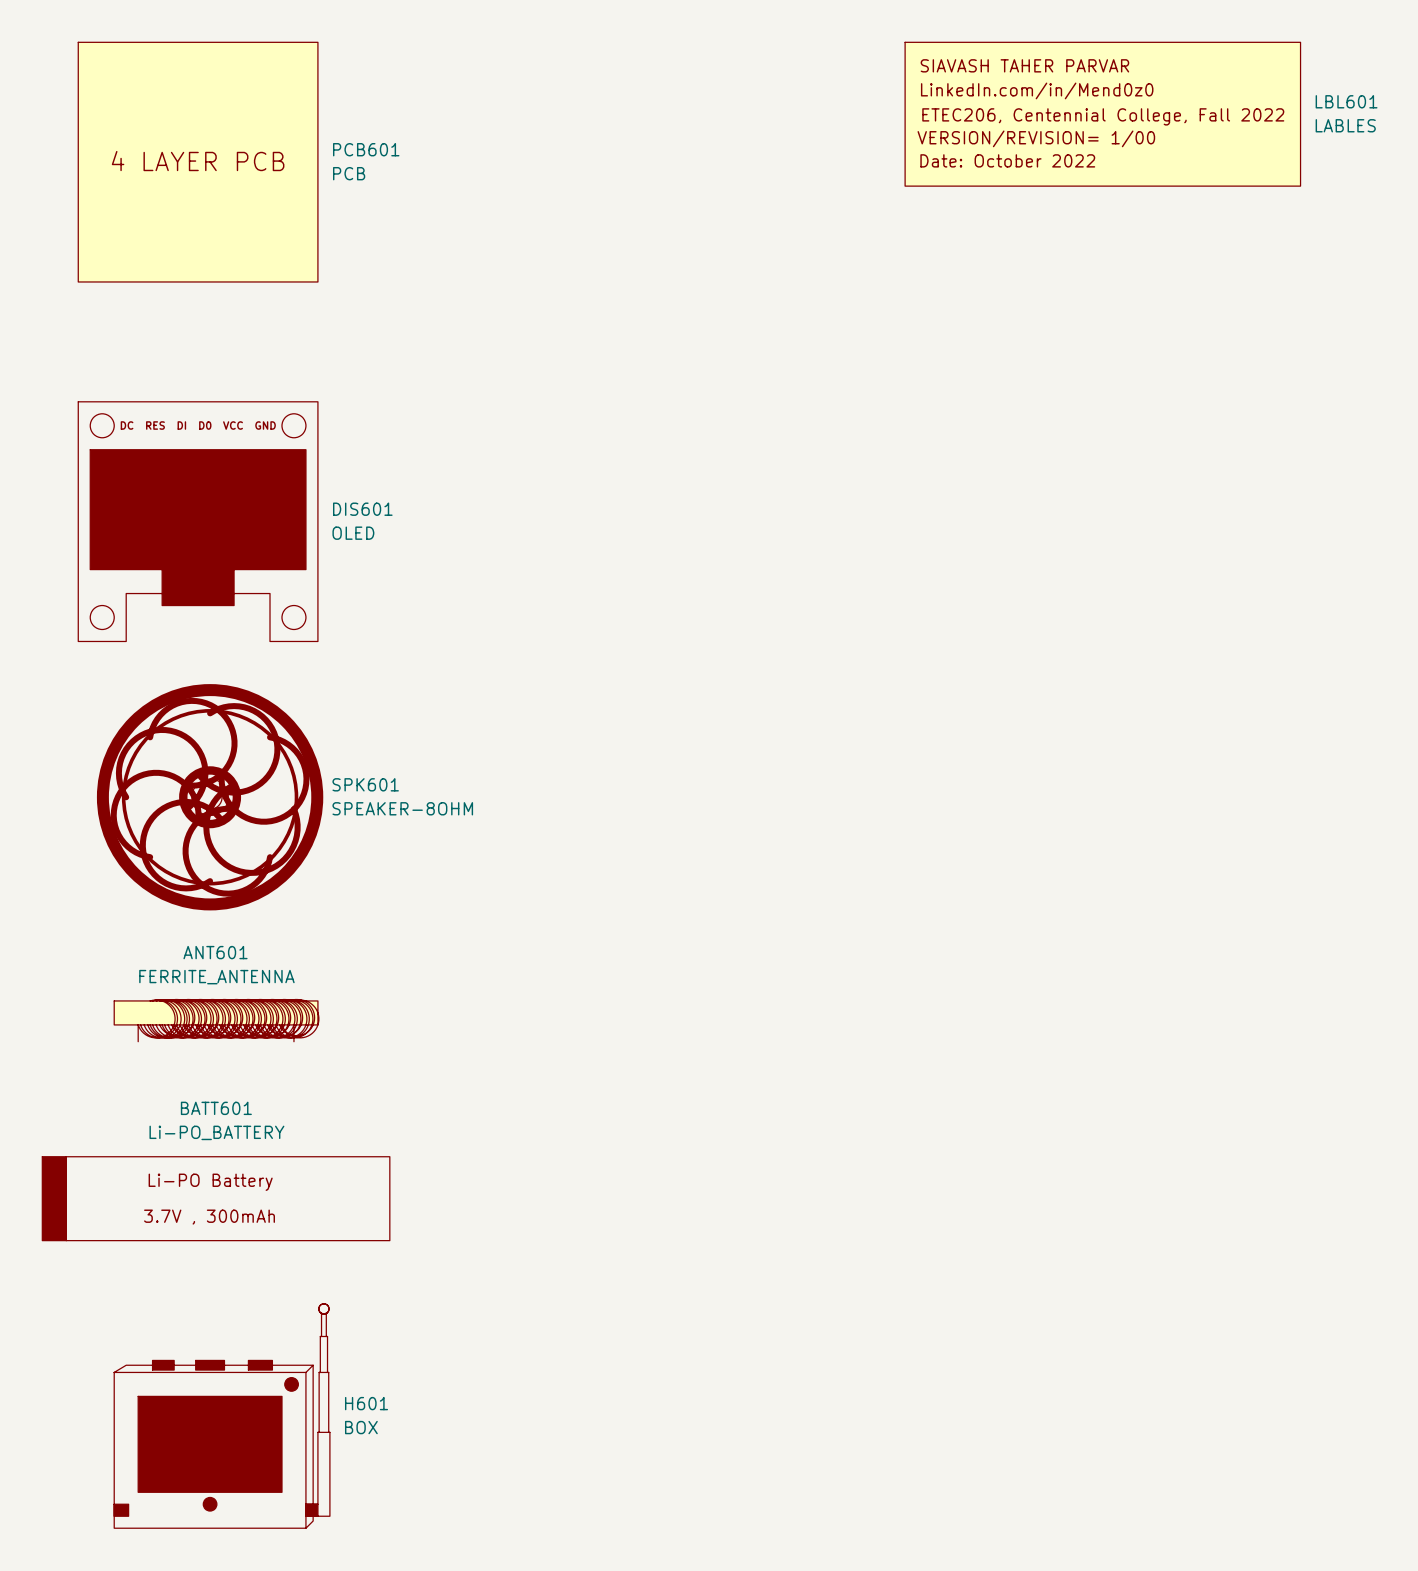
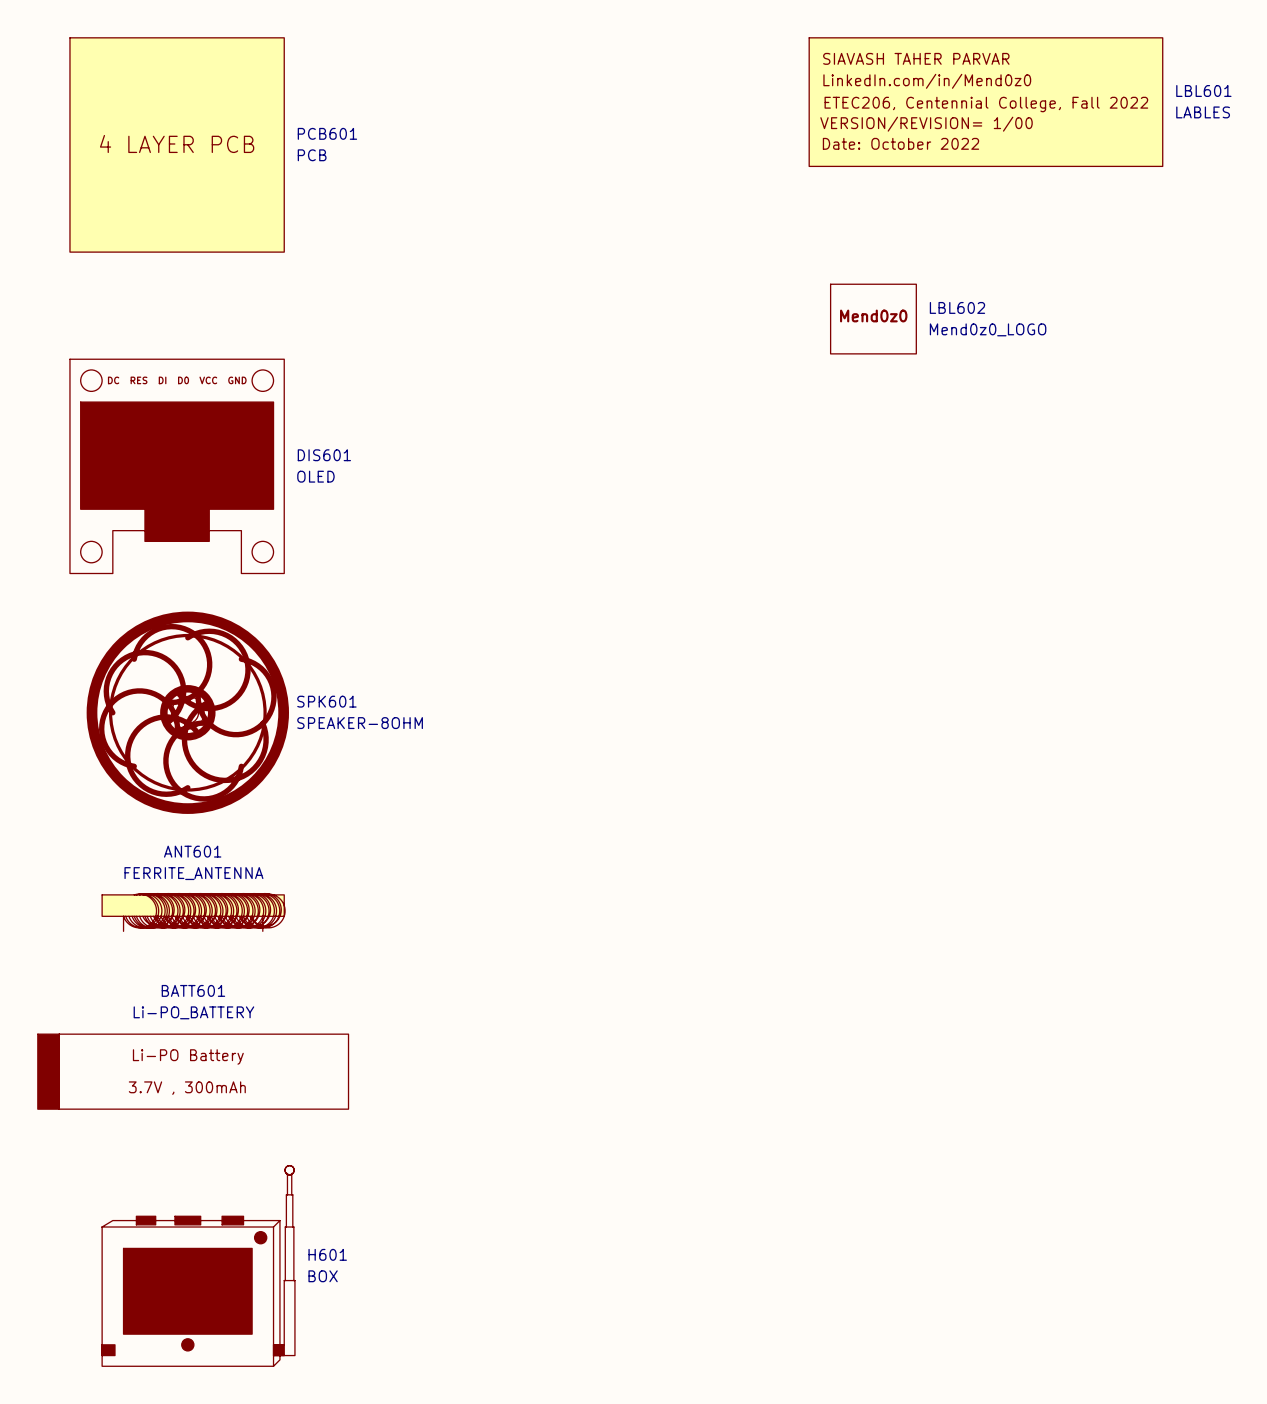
LBL602: none -> Mend0z0_LOGO (873, 319)

